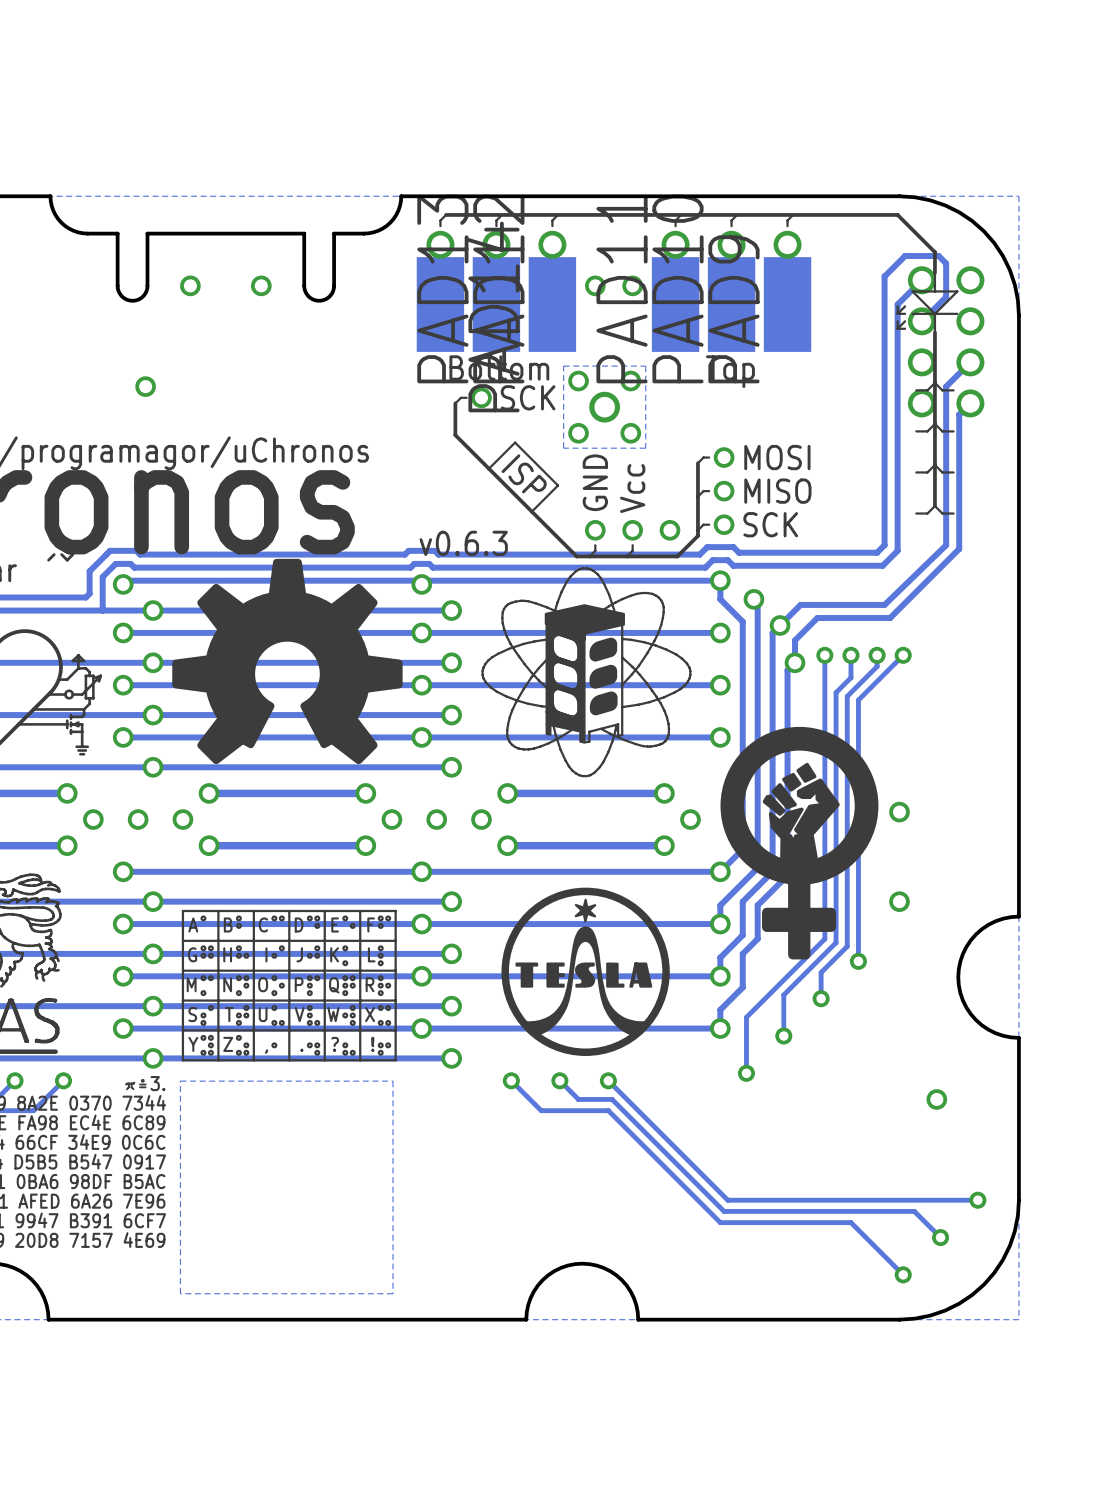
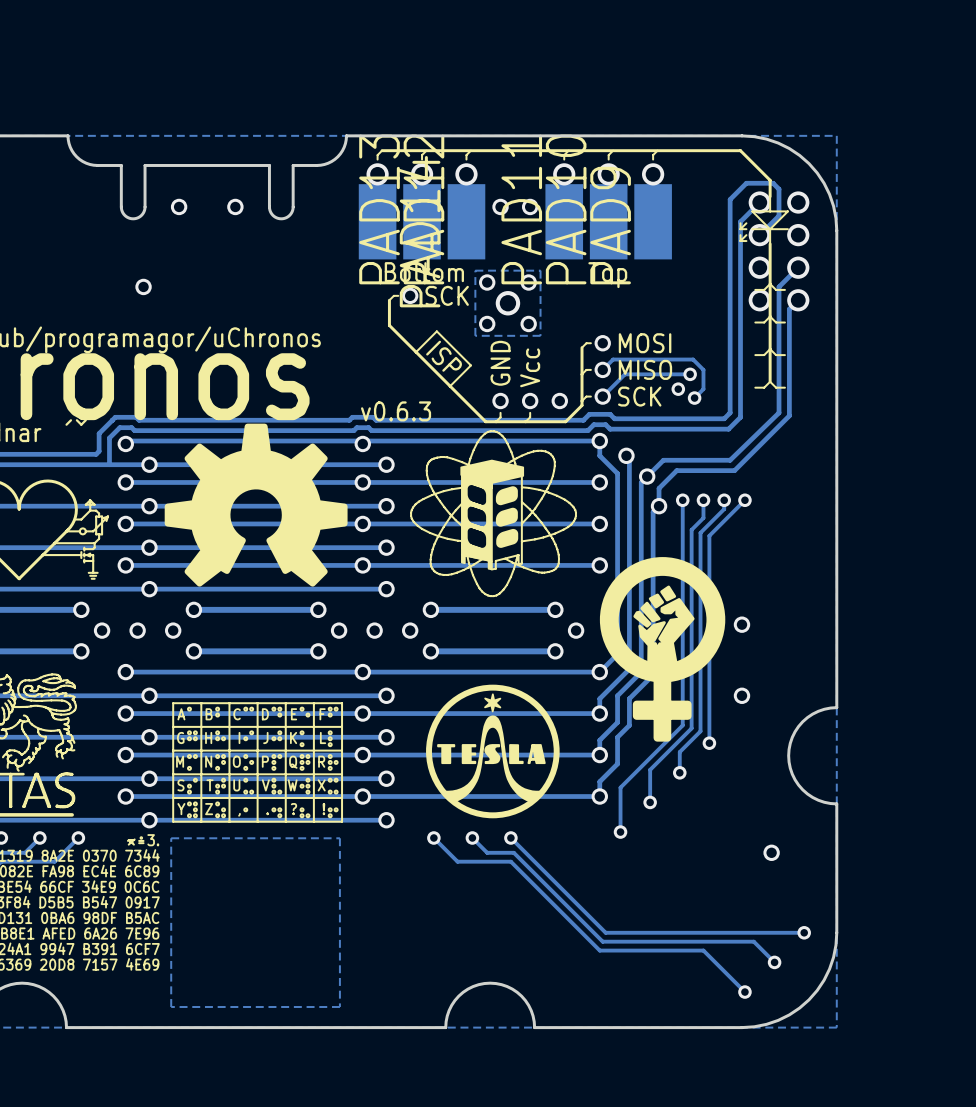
track: none -> (602, 369) (613, 359) (693, 359) (703, 369) (703, 389) (694, 398)
track: none -> (690, 374) (624, 374) (602, 396)
via: none -> (690, 374)
via: none -> (678, 389)
via: none -> (694, 398)

